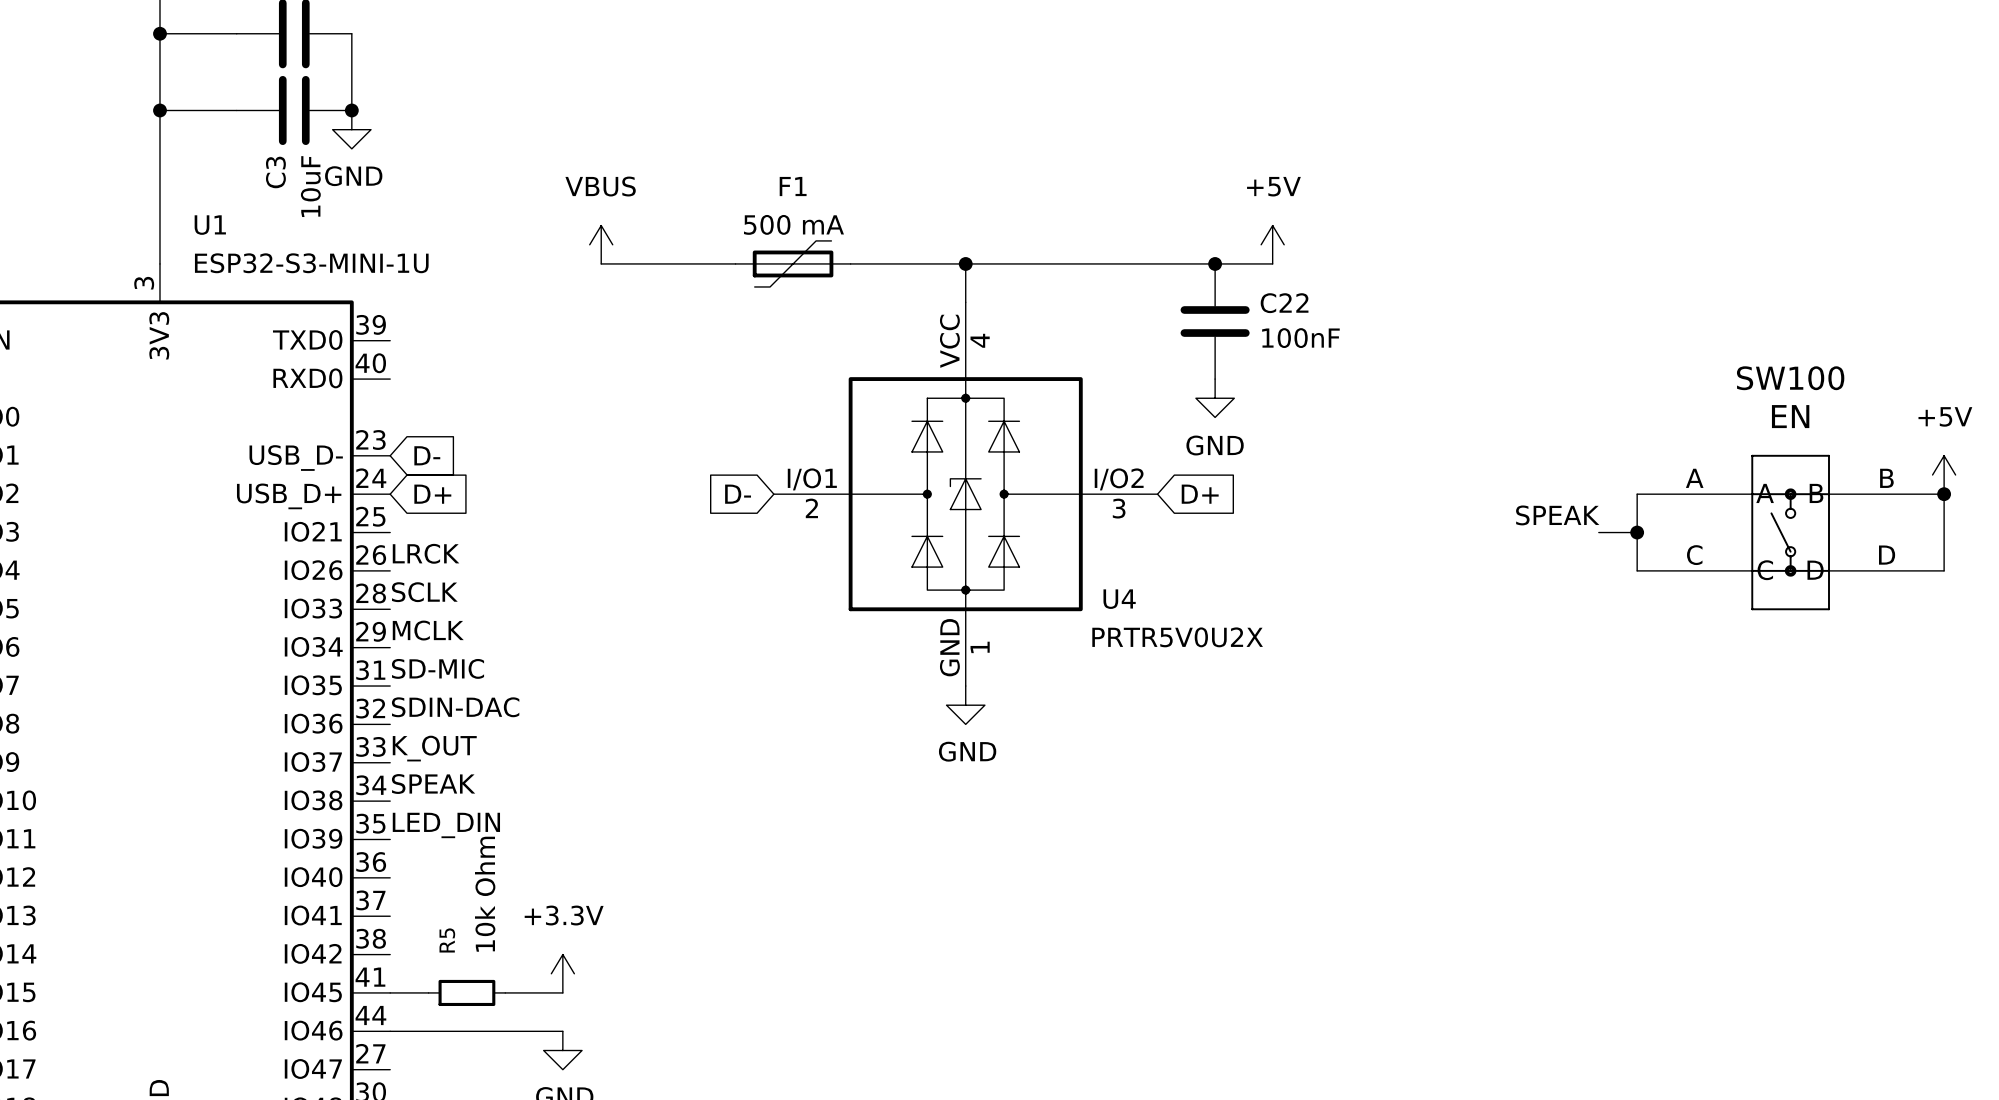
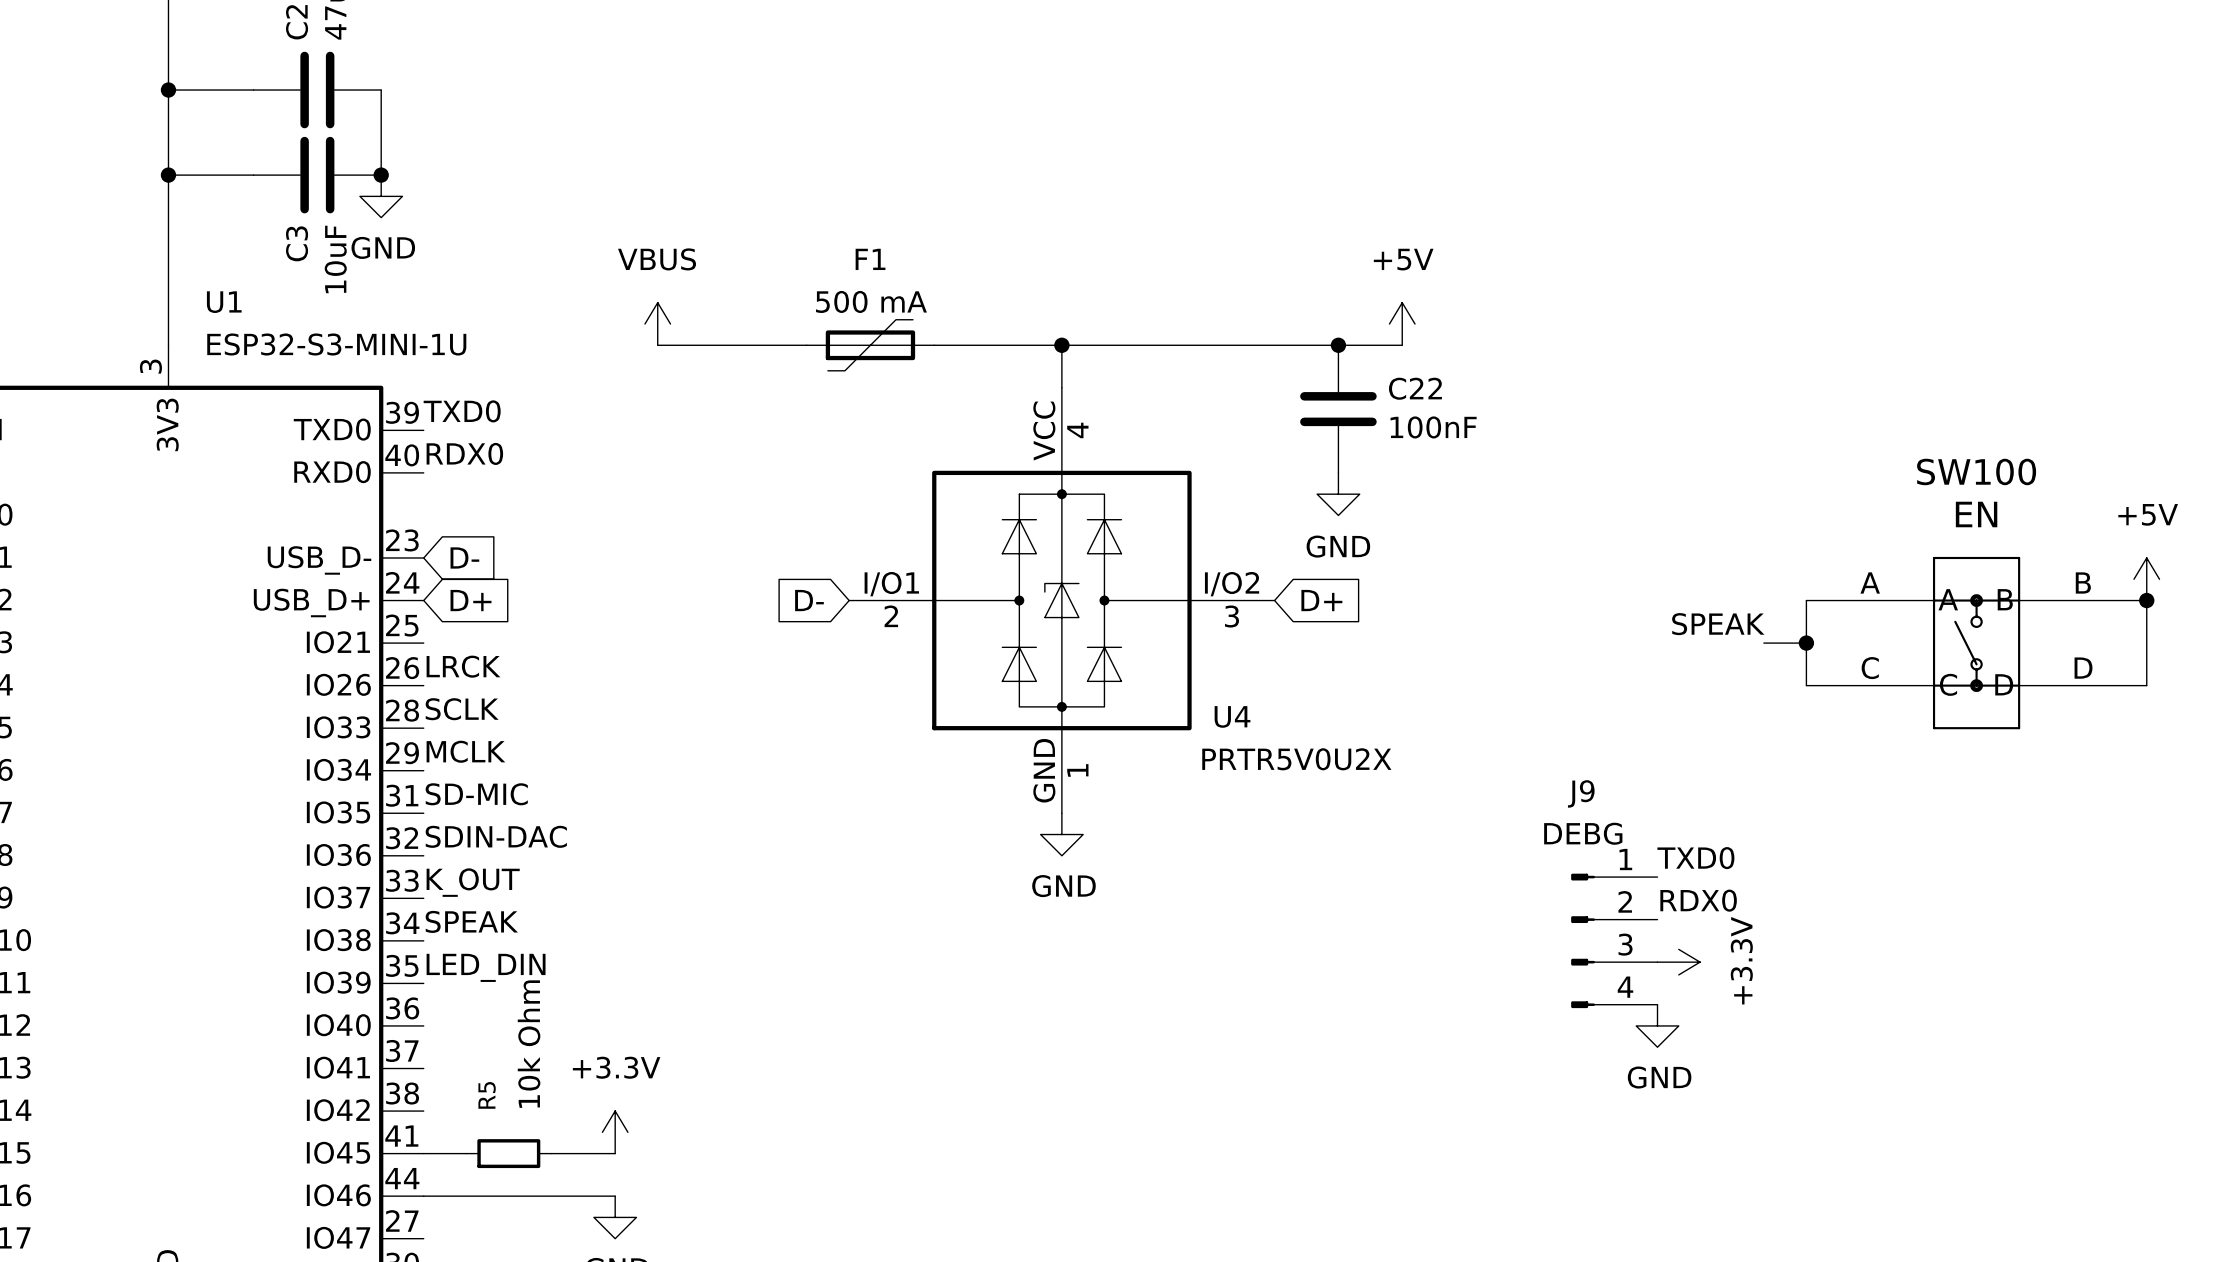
label: none -> TXD0 (462, 411)
label: none -> RDX0 (464, 453)
label: none -> TXD0 (1695, 858)
label: none -> RDX0 (1698, 900)
J9: none -> DEBG (1614, 940)
power symbol: none -> +3.3V (1678, 962)
power symbol: none -> GND (1657, 1025)

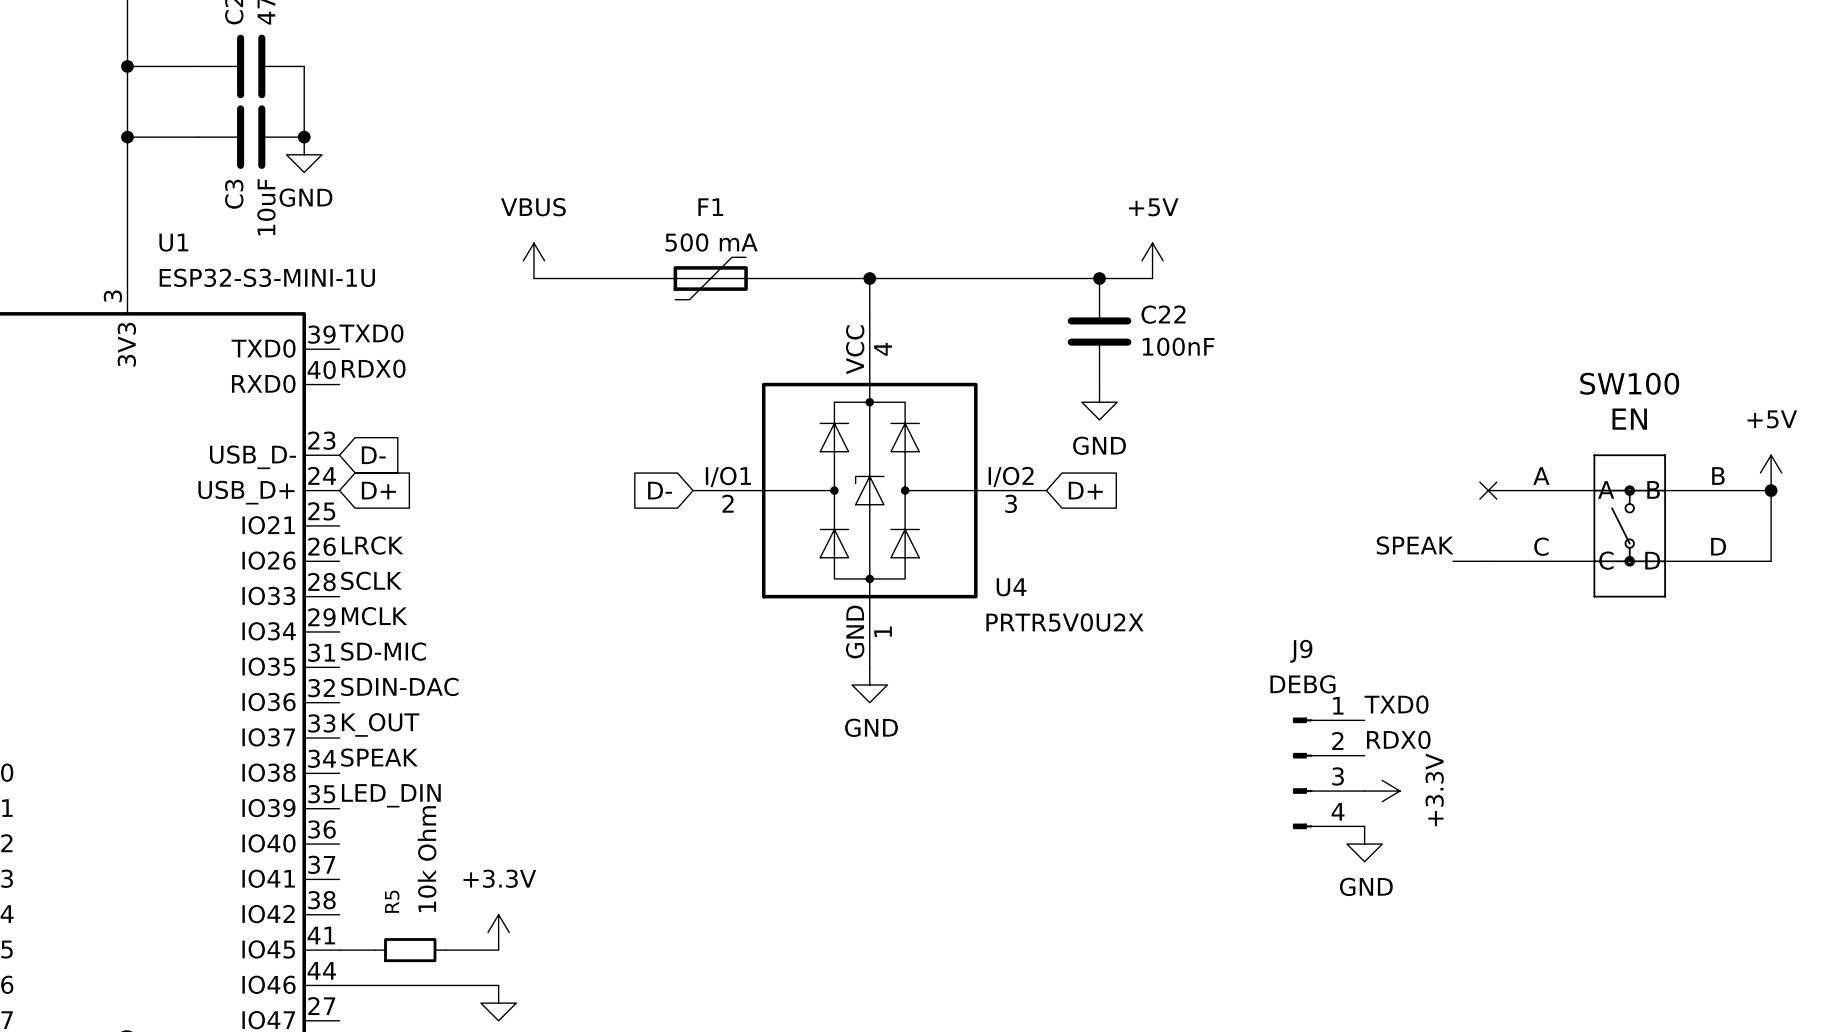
wire: (1806, 600) (1806, 685) -> (1452, 561) (1488, 561)
no-connect mark: none -> (1488, 490)
label position: SPEAK (1718, 624) -> SPEAK (1415, 545)
wire: (1763, 643) (1806, 643) -> none
junction: (1806, 643) -> none

